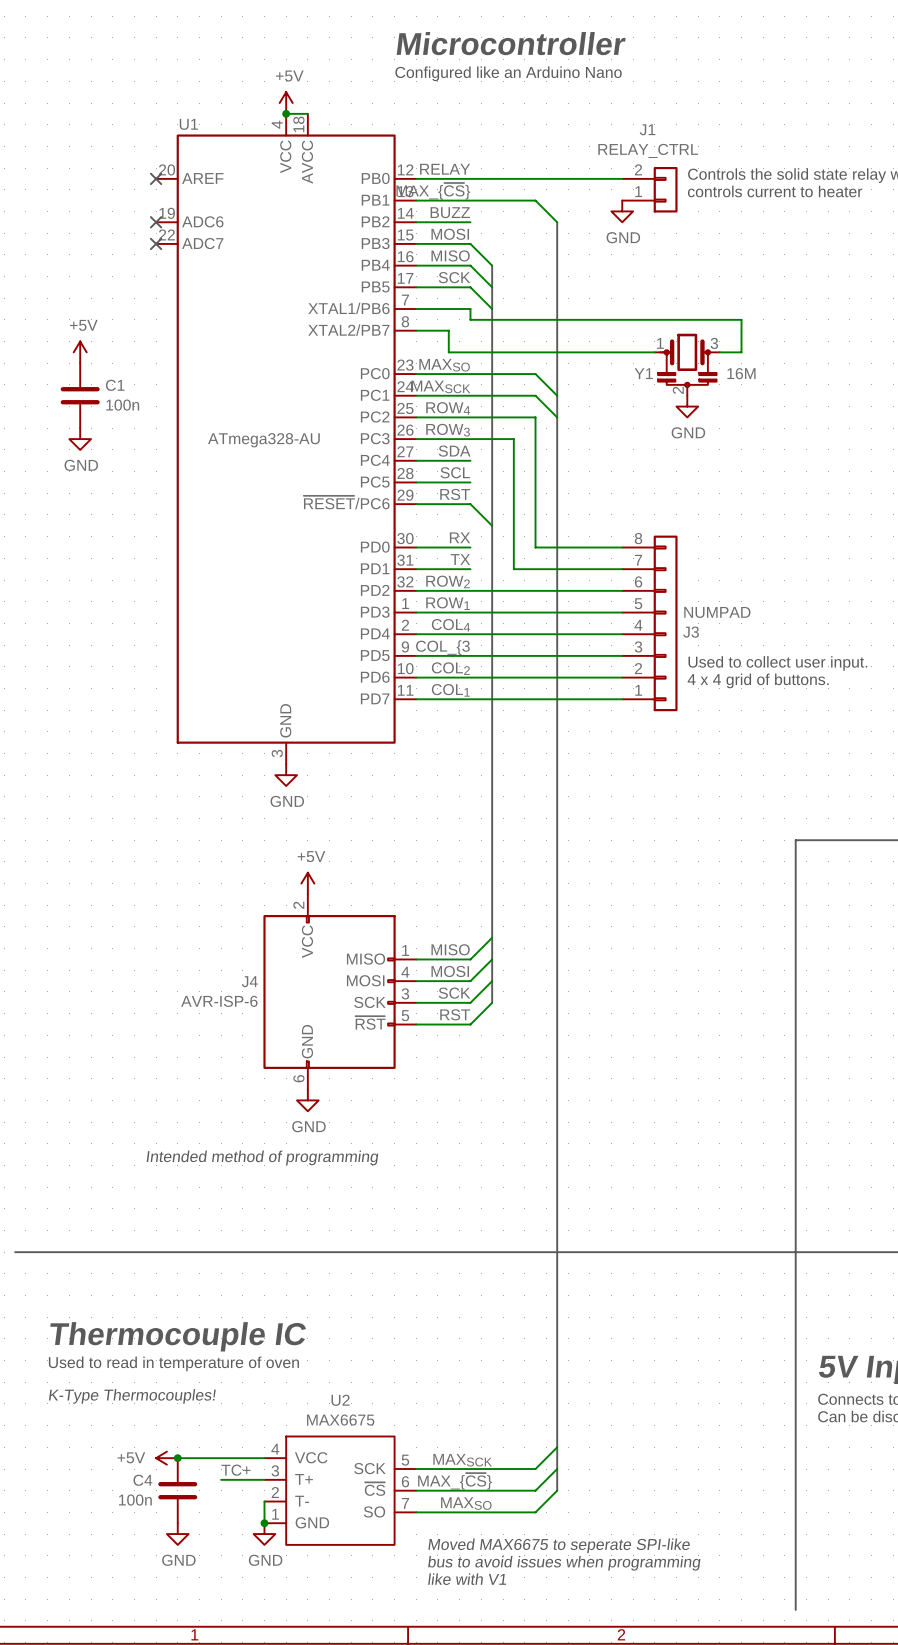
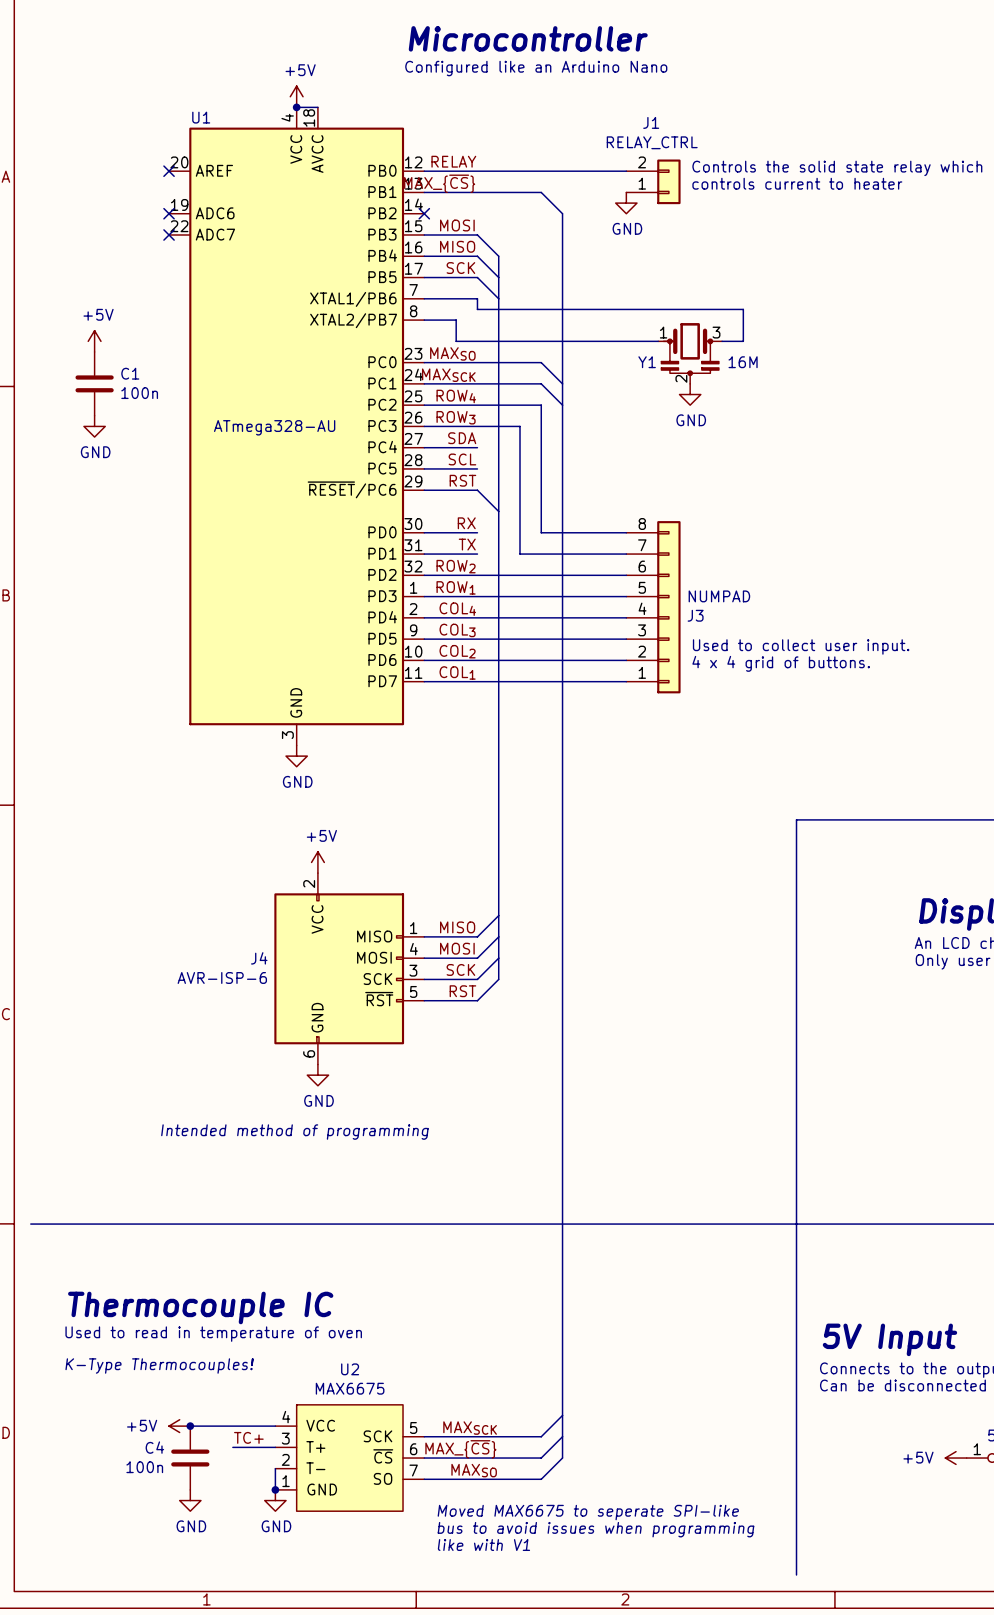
label: BUZZ (450, 212) -> none
wire: (416, 222) (470, 222) -> none
no-connect mark: none -> (424, 213)
label: COL_{3 (442, 647) -> COL3 (457, 630)

